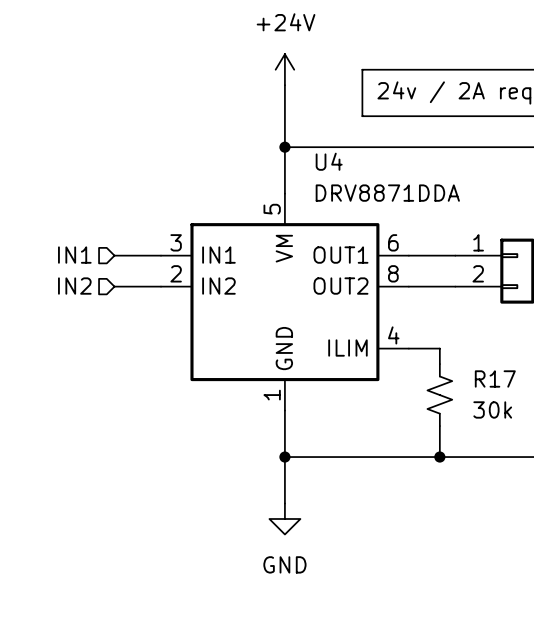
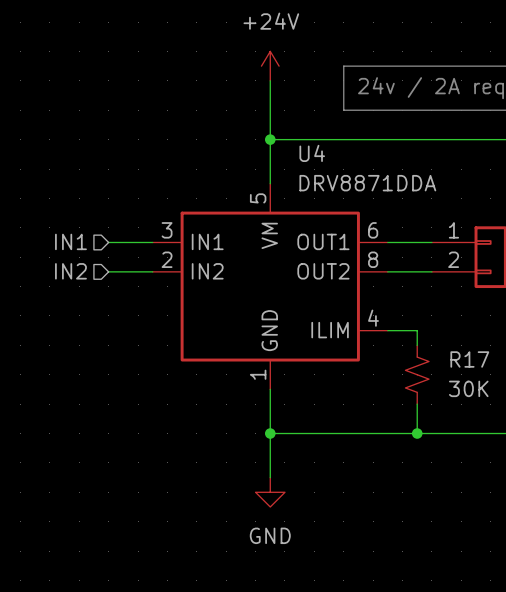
R17 value: 30k (492, 409) -> 30K (468, 388)

